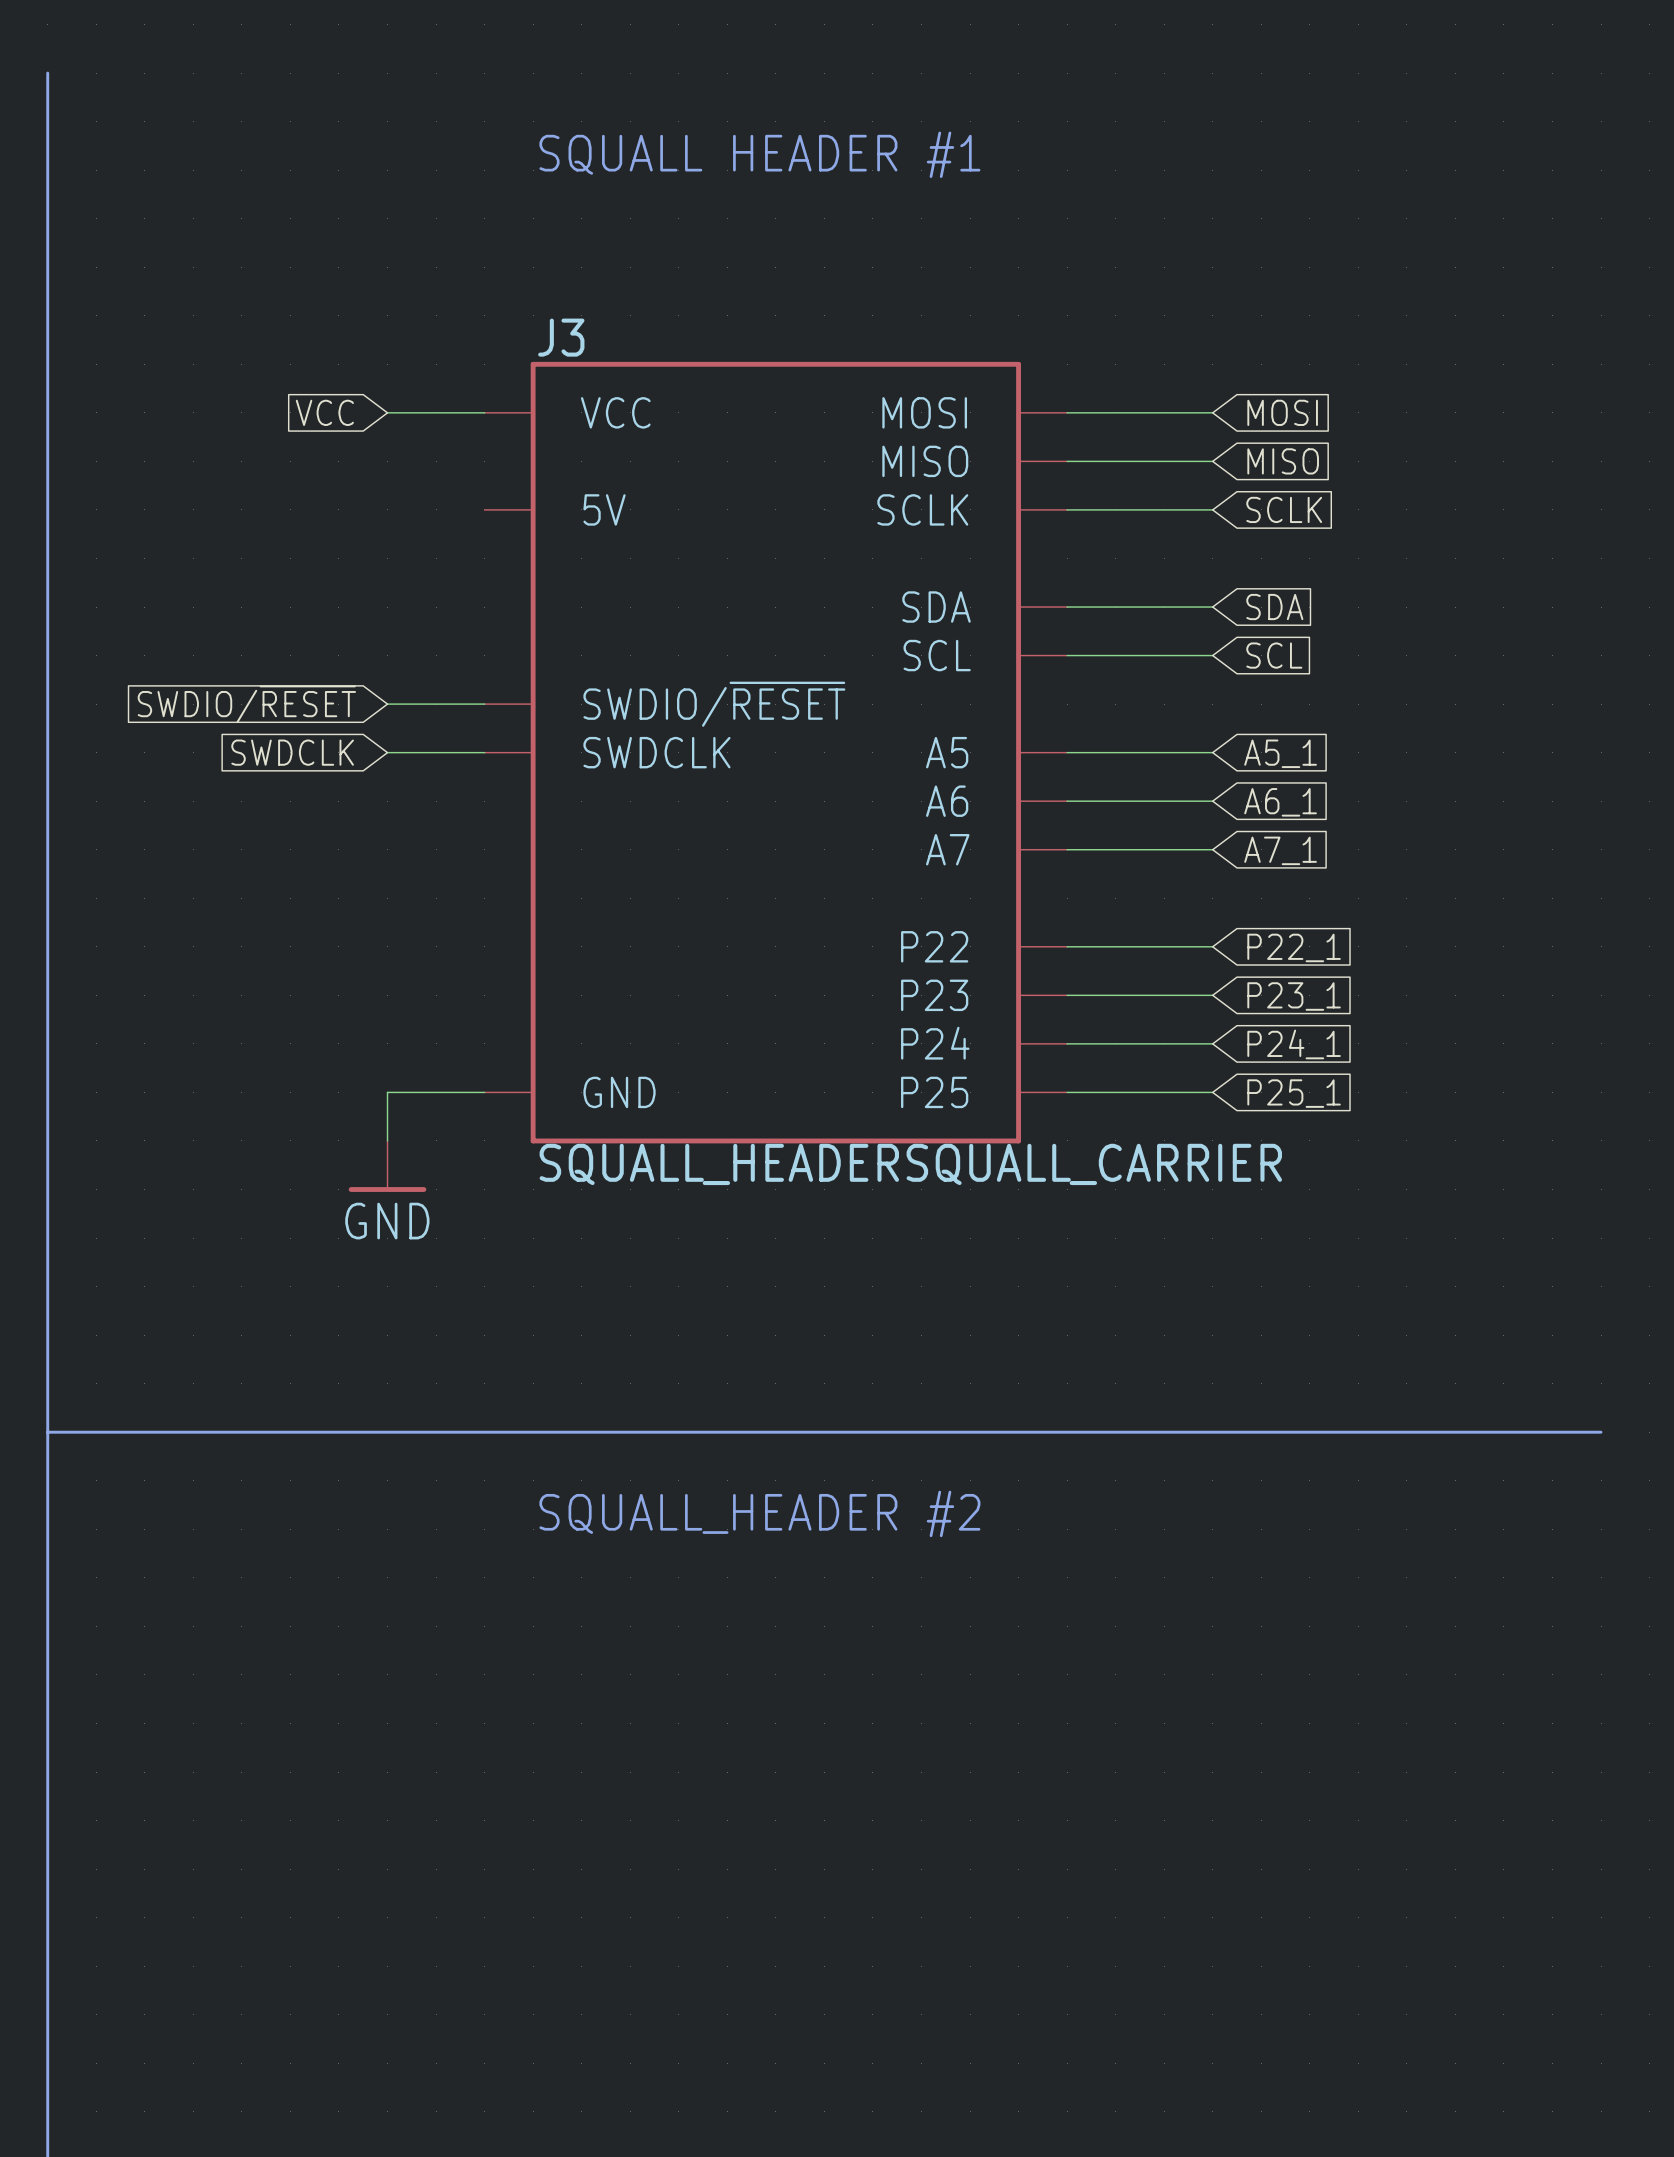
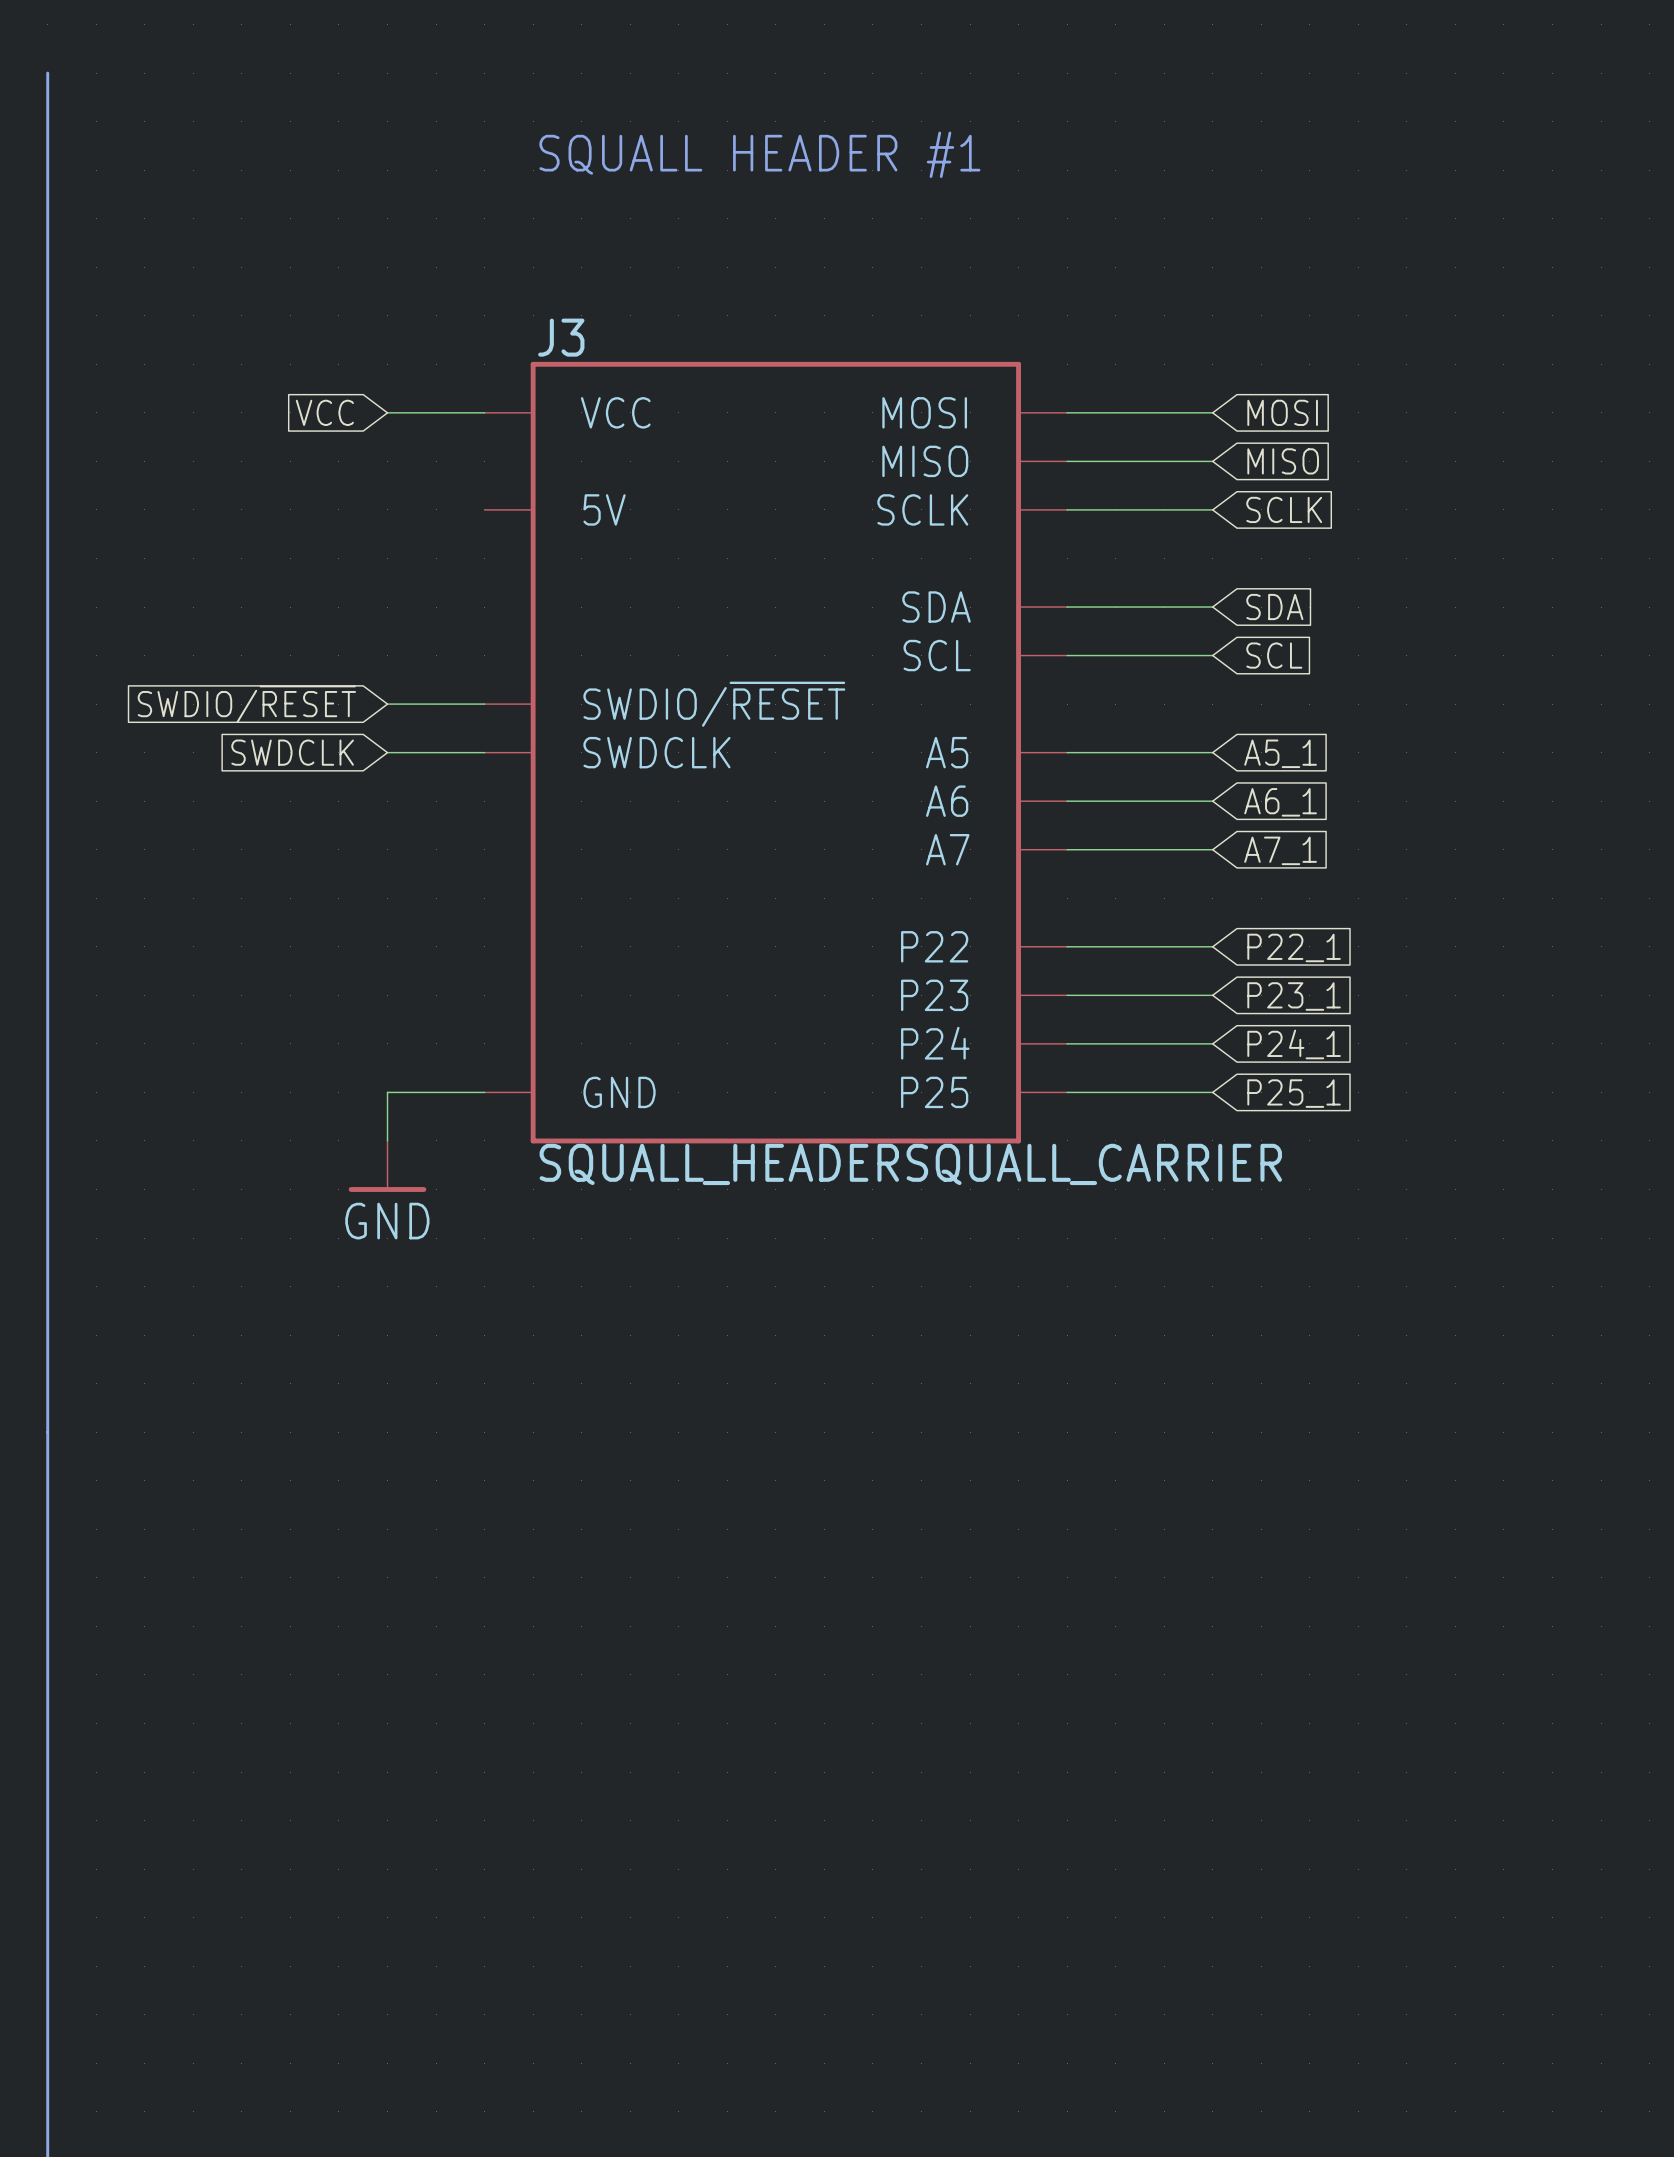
line: (47, 1432) (1601, 1432) -> none
text: SQUALL_HEADER #2 (759, 1513) -> none

